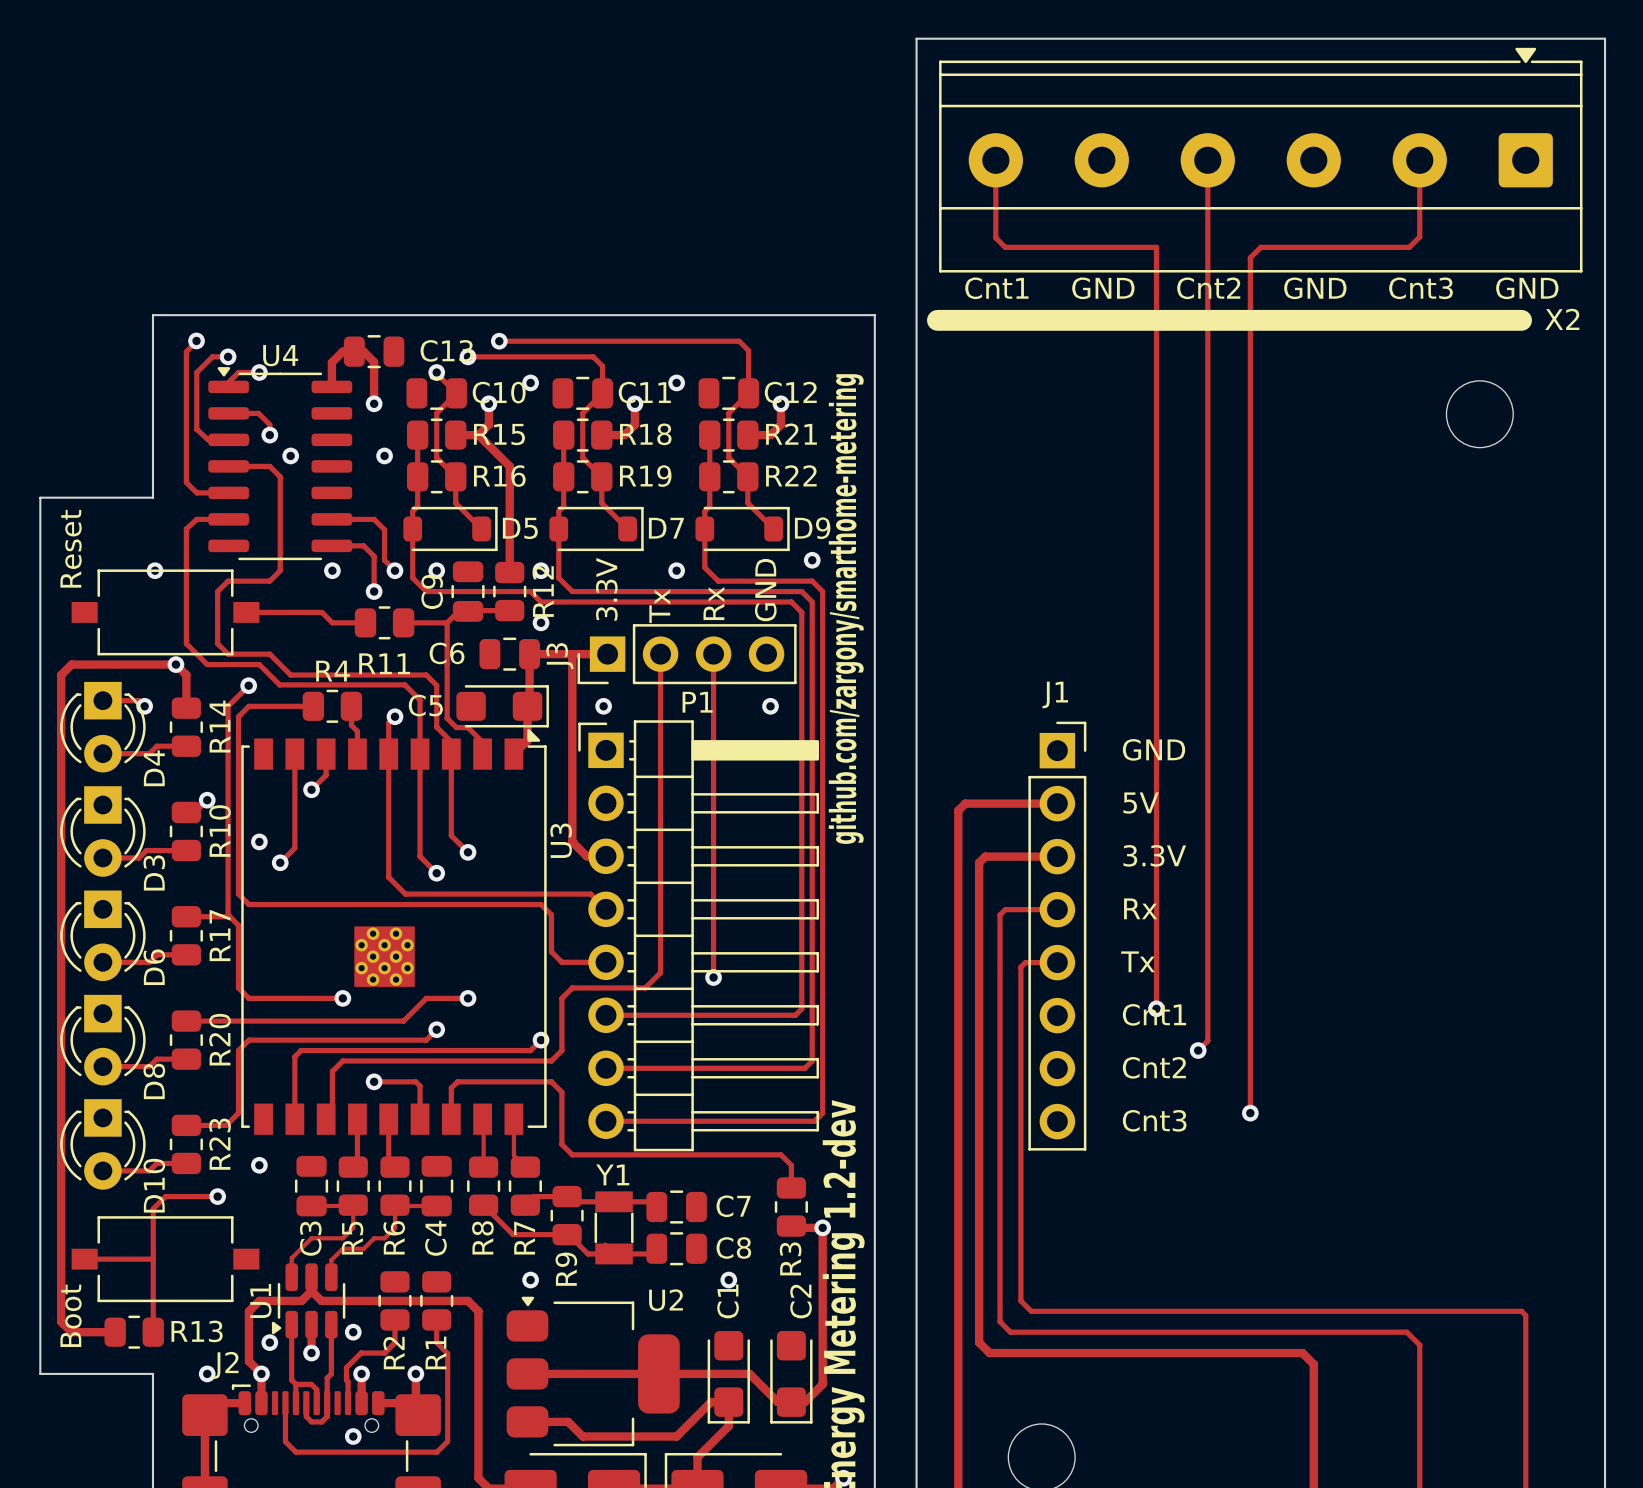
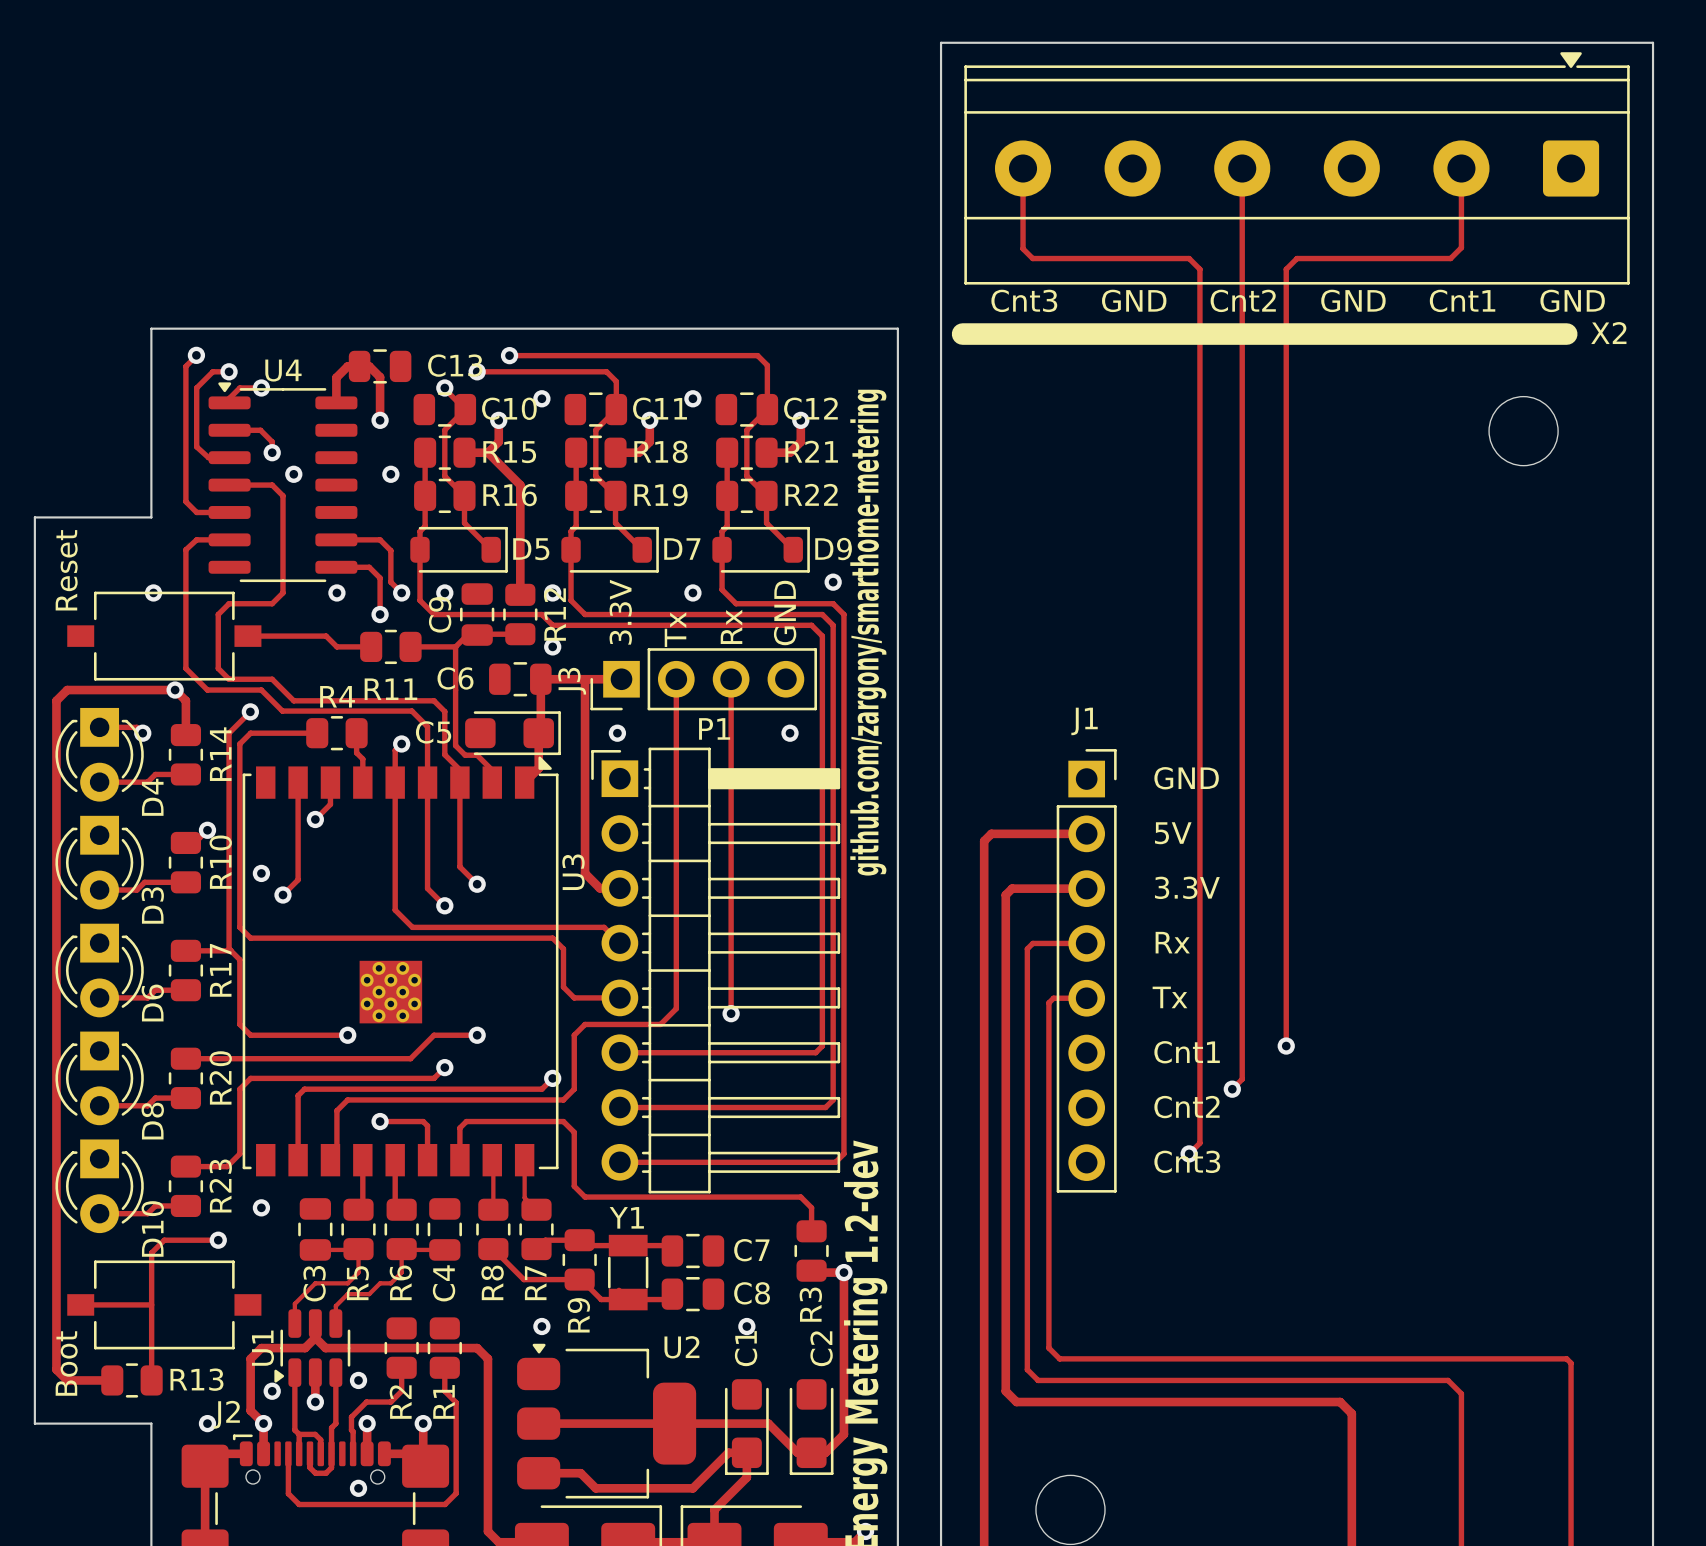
track: (1156, 247) (1156, 1008) -> (1189, 258) (1199, 269) (1199, 1143) (1189, 1153)
text: Cnt1 (996, 288) -> Cnt3 (1024, 300)
text: Cnt3 (1421, 288) -> Cnt1 (1462, 300)
via: (1156, 1008) -> none
track: (1250, 1008) (1250, 1113) -> none
via: none -> (1286, 1046)
via: none -> (1189, 1153)
via: (1250, 1113) -> none

